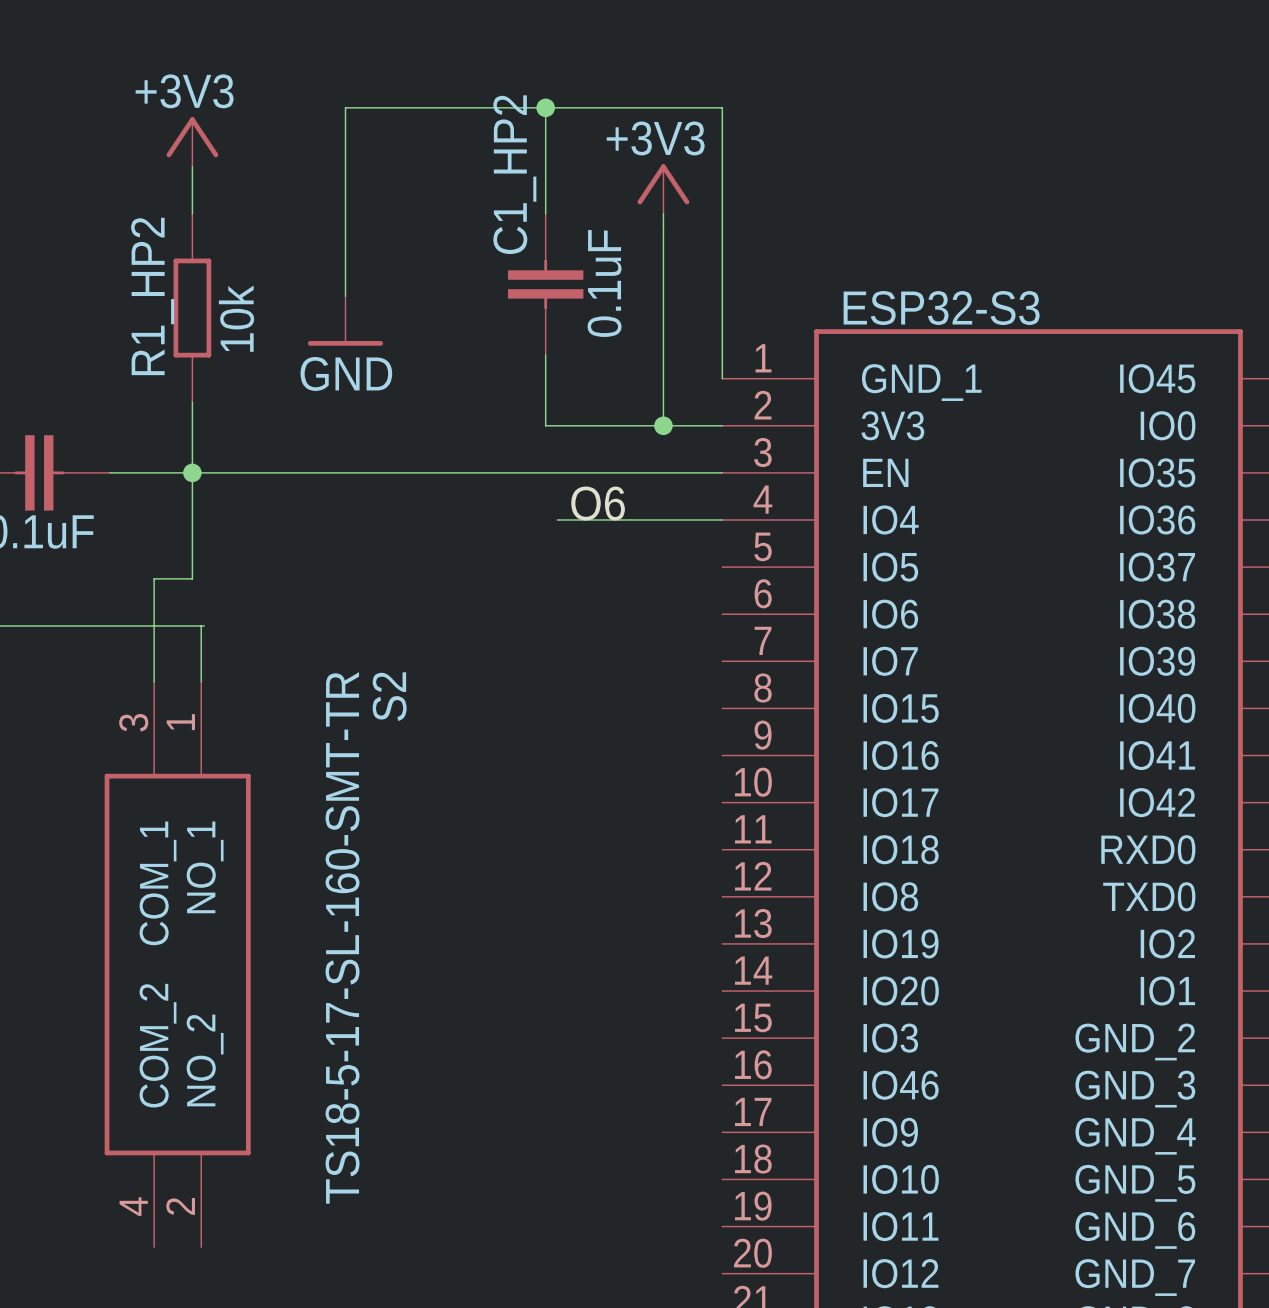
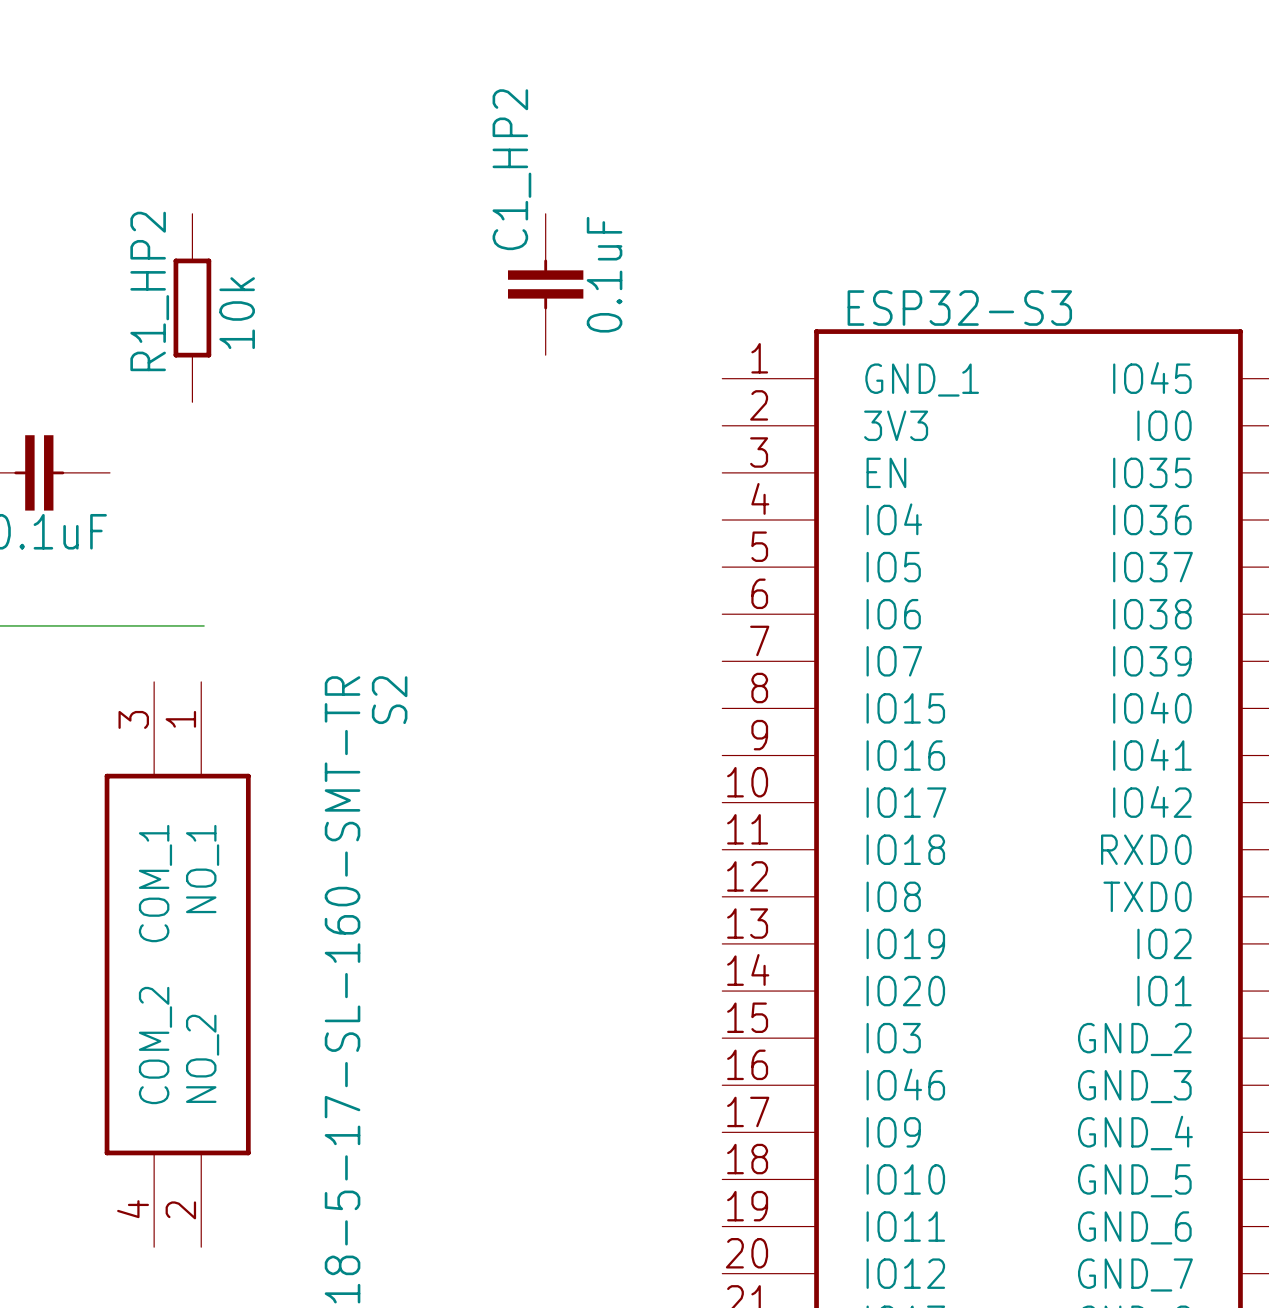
wire: (545, 107) (545, 213) -> none
junction: (545, 107) -> none
power symbol: +3V3 (192, 141) -> none
wire: (192, 166) (192, 213) -> none
power symbol: +3V3 (663, 189) -> none
wire: (663, 213) (663, 425) -> none
wire: (345, 296) (345, 107) (722, 107) (722, 378) -> none
power symbol: GND (345, 320) -> none
wire: (545, 355) (545, 425) (722, 425) -> none
wire: (192, 402) (192, 578) (154, 578) (154, 681) -> none
junction: (663, 425) -> none
wire: (109, 472) (722, 472) -> none
junction: (192, 472) -> none
label: O6 (598, 503) -> none
wire: (557, 520) (722, 520) -> none
wire: (201, 625) (201, 681) -> none

